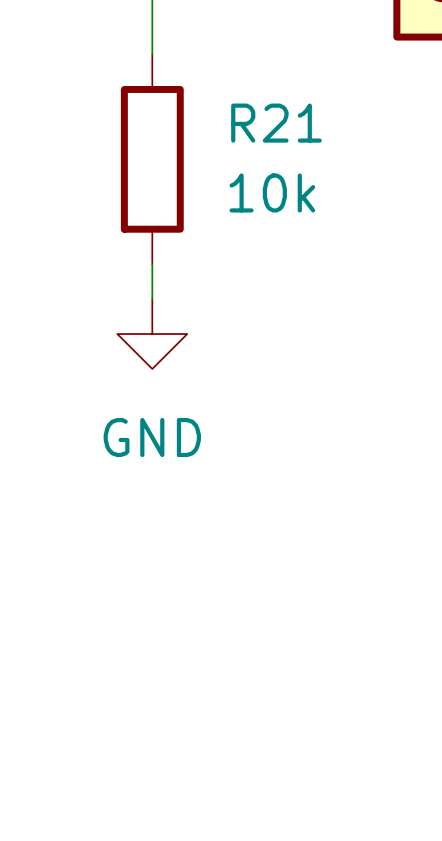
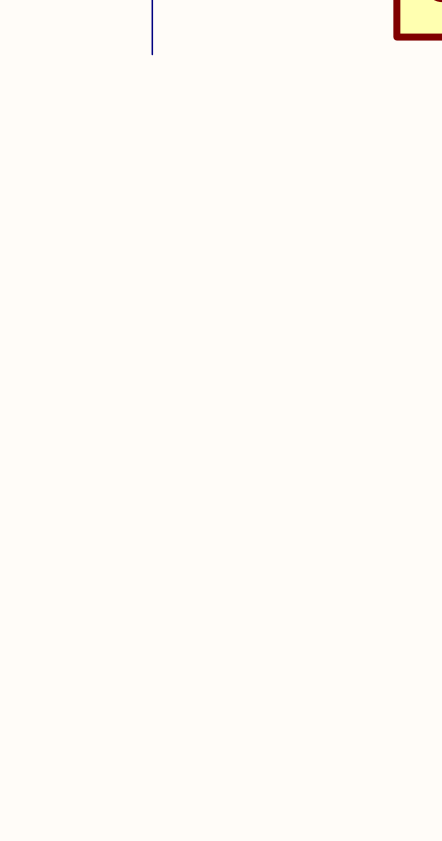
R21: 10k (152, 159) -> none
wire: (152, 264) (152, 299) -> none
power symbol: GND (152, 334) -> none

